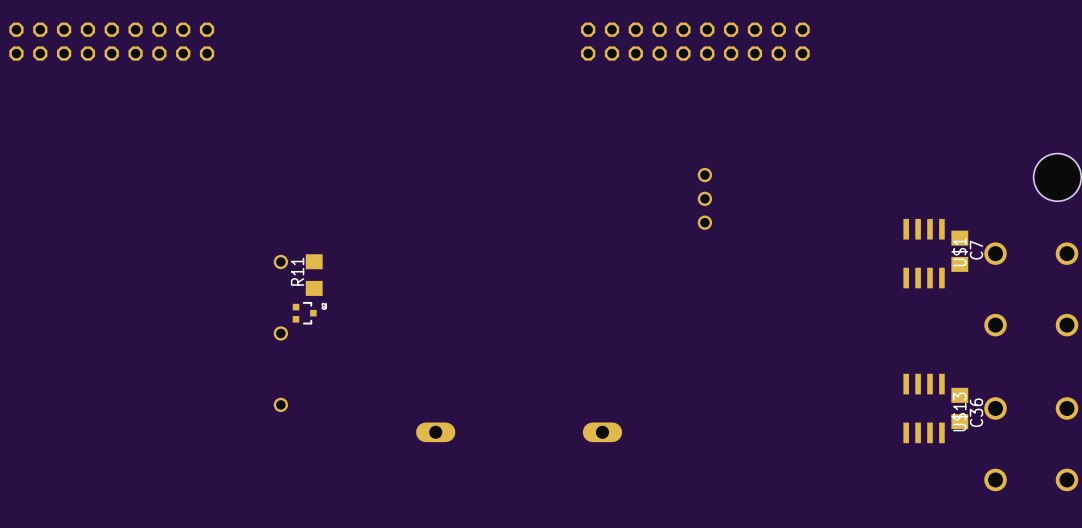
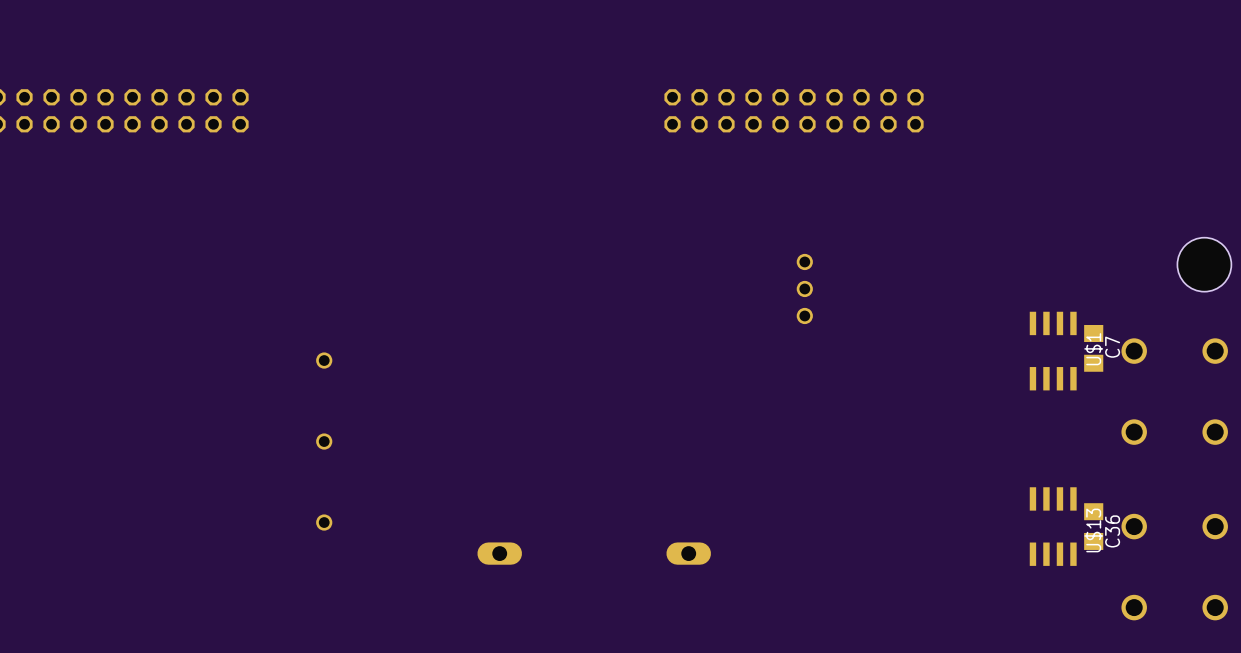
R11: (314, 275) -> none
part: (304, 313) -> none

